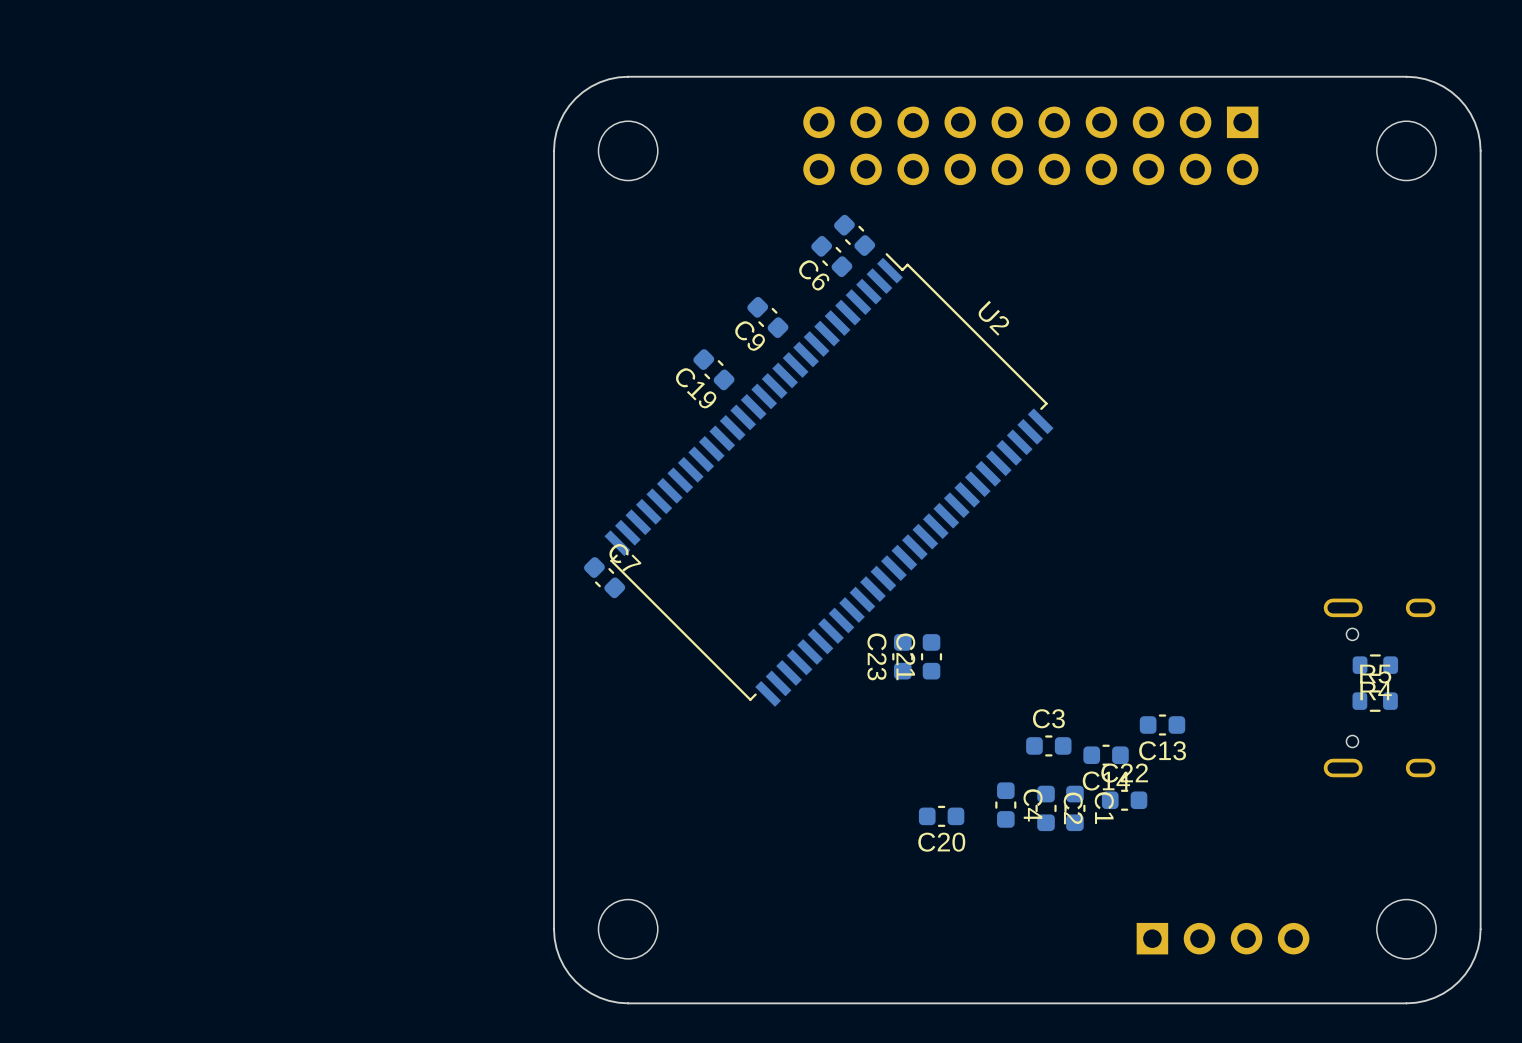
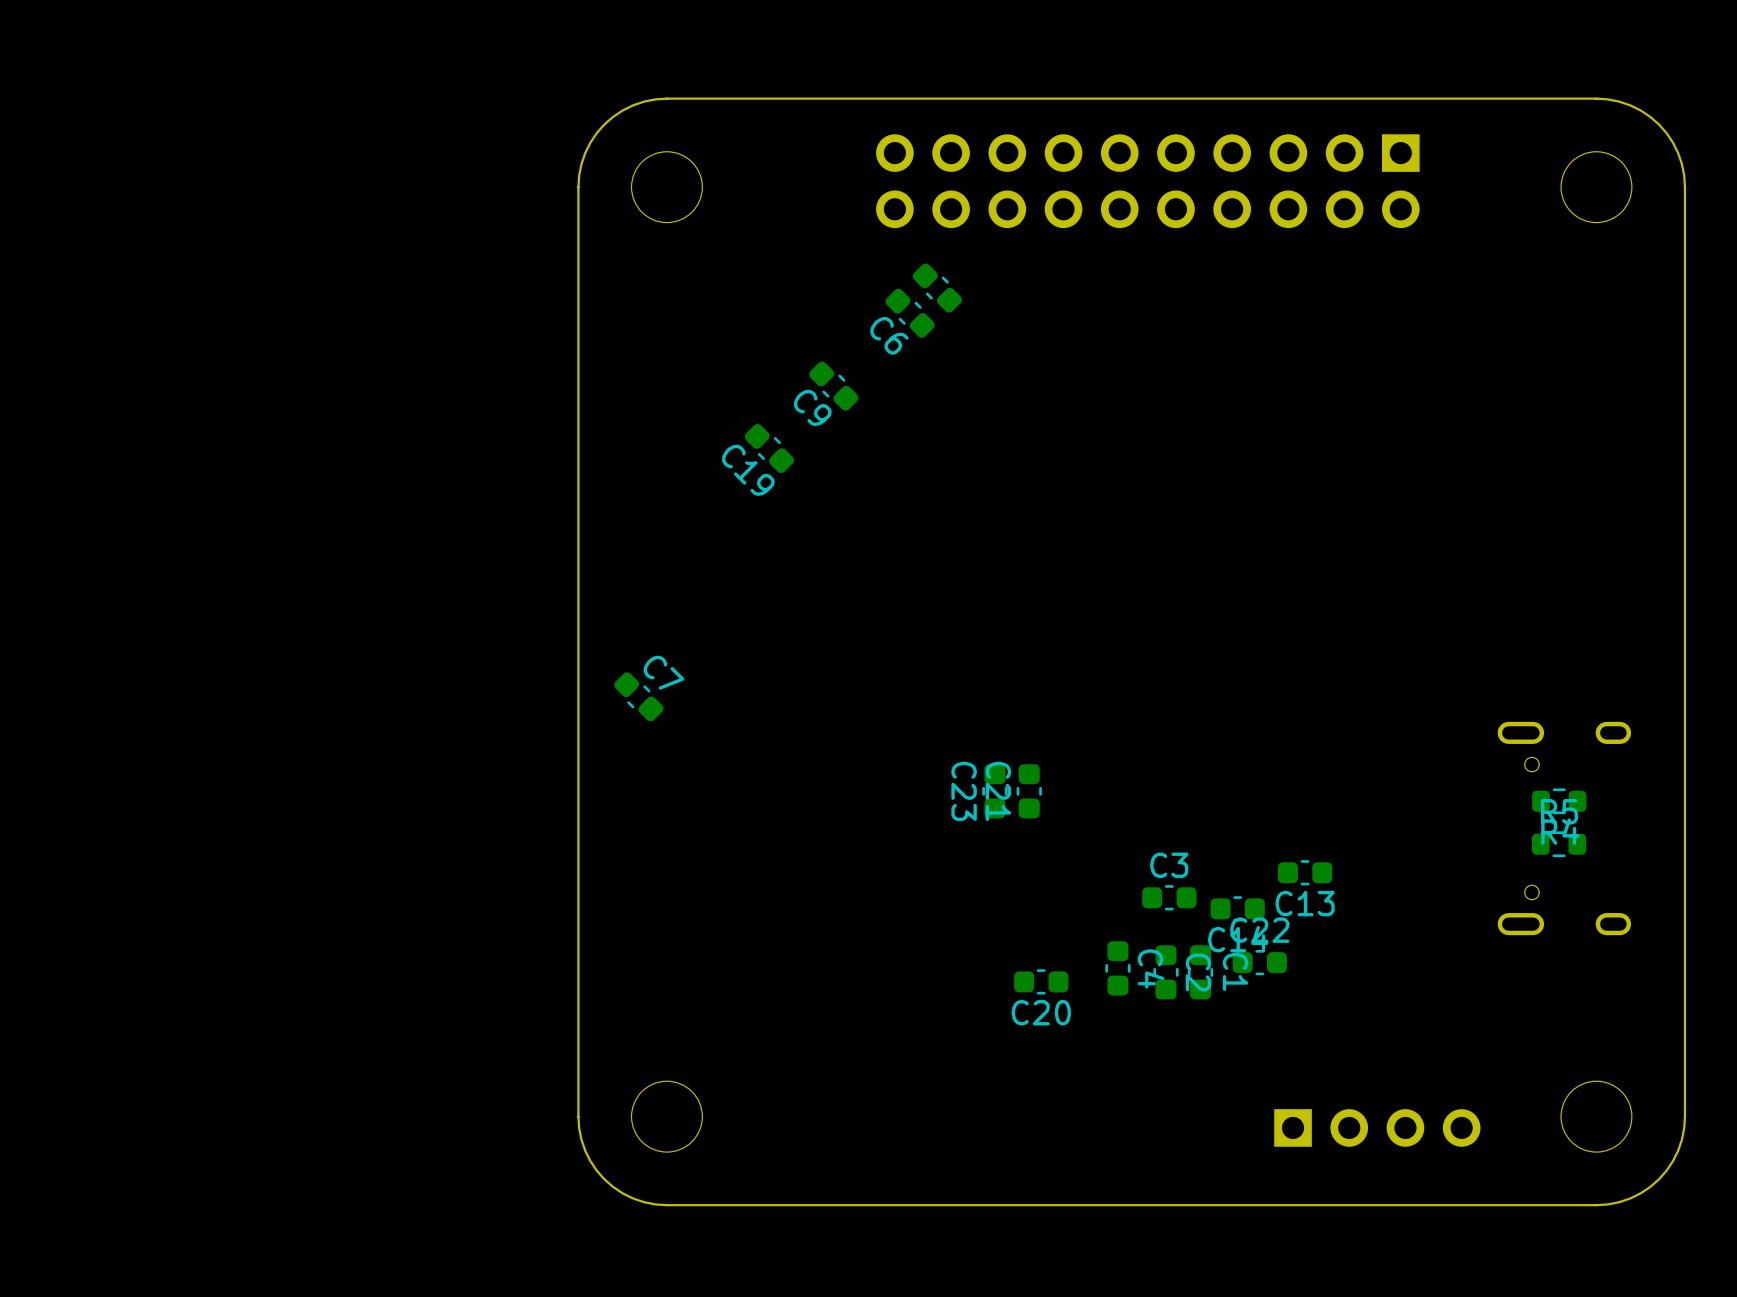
U2: (829, 479) -> none

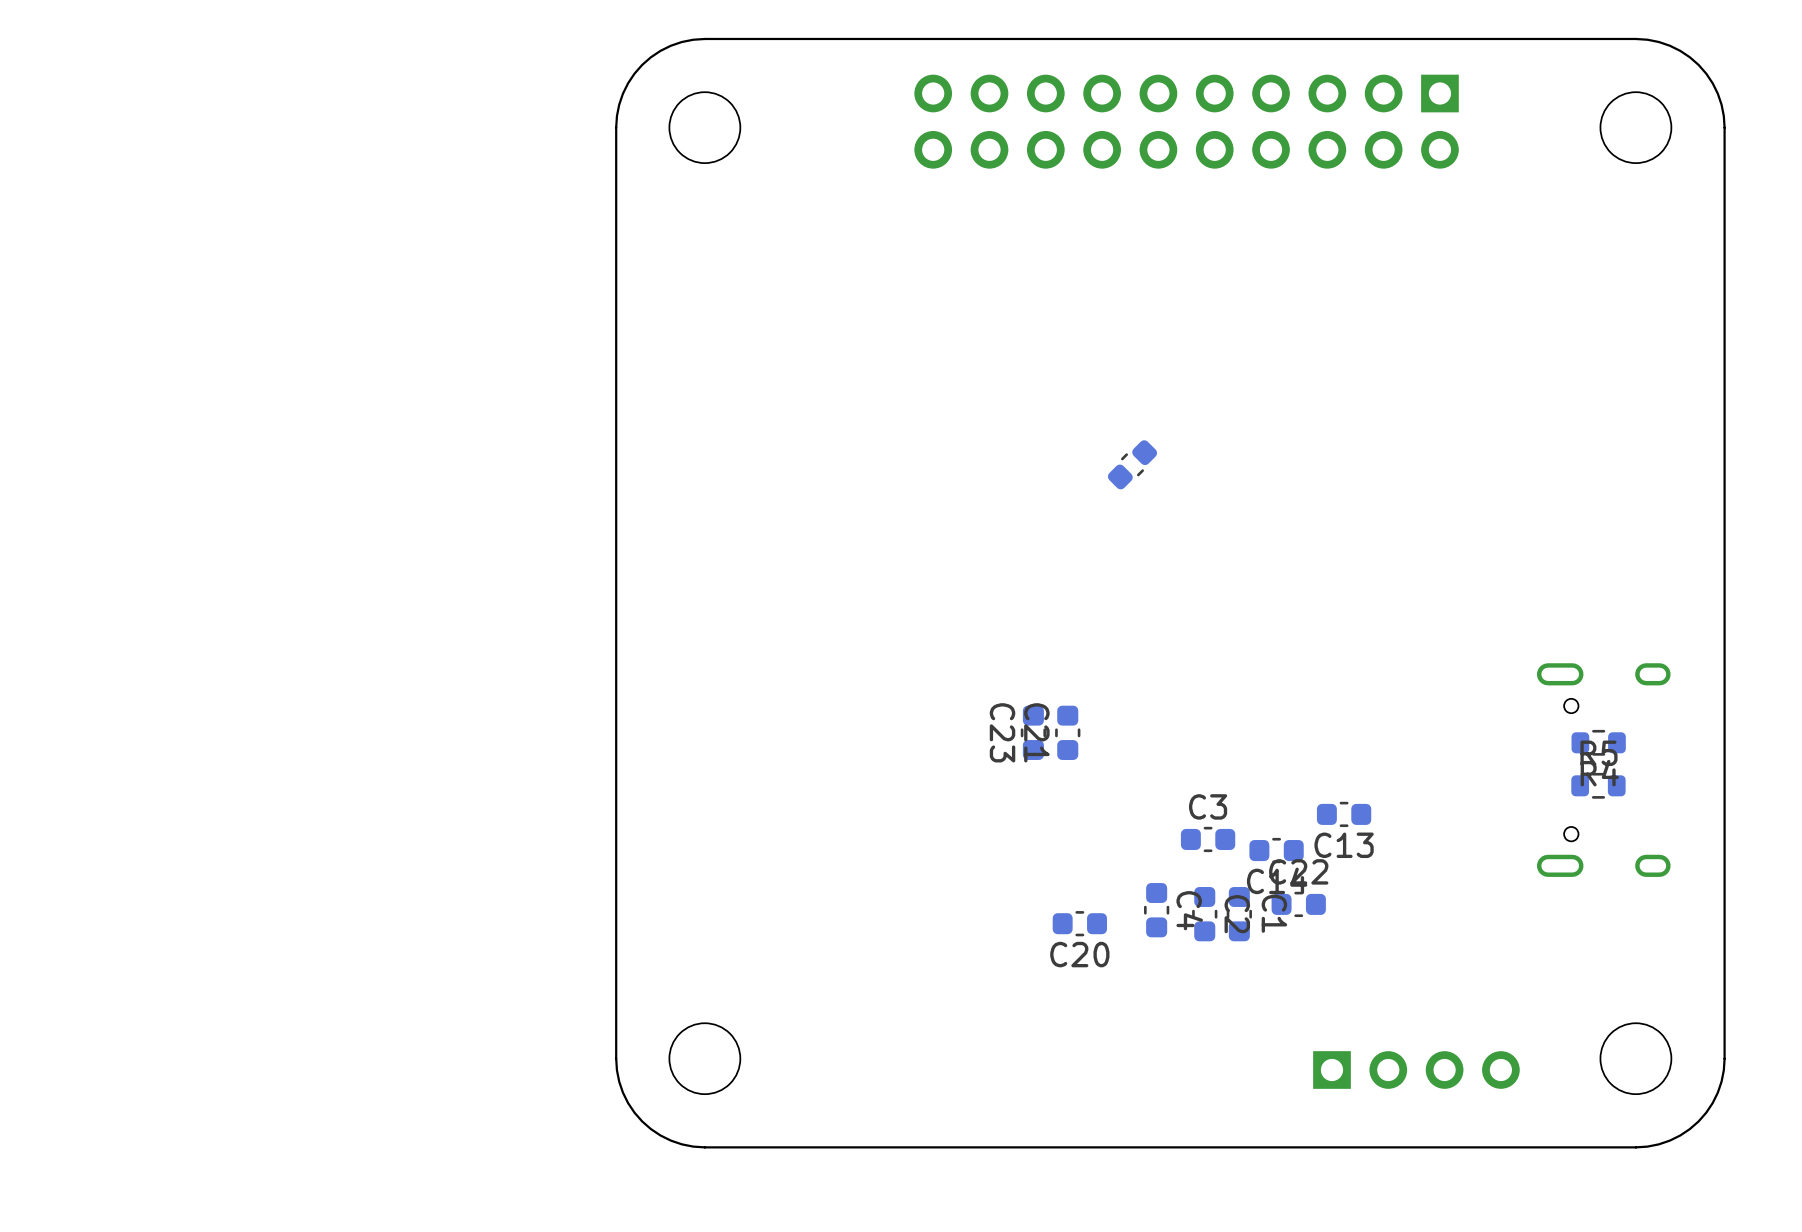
part rotation: 0° (937, 288) -> 90° clockwise (1132, 464)
part position: (937, 288) -> (1132, 464)
C6: (910, 313) -> none
C9: (833, 386) -> none
C19: (769, 448) -> none
C7: (638, 696) -> none

